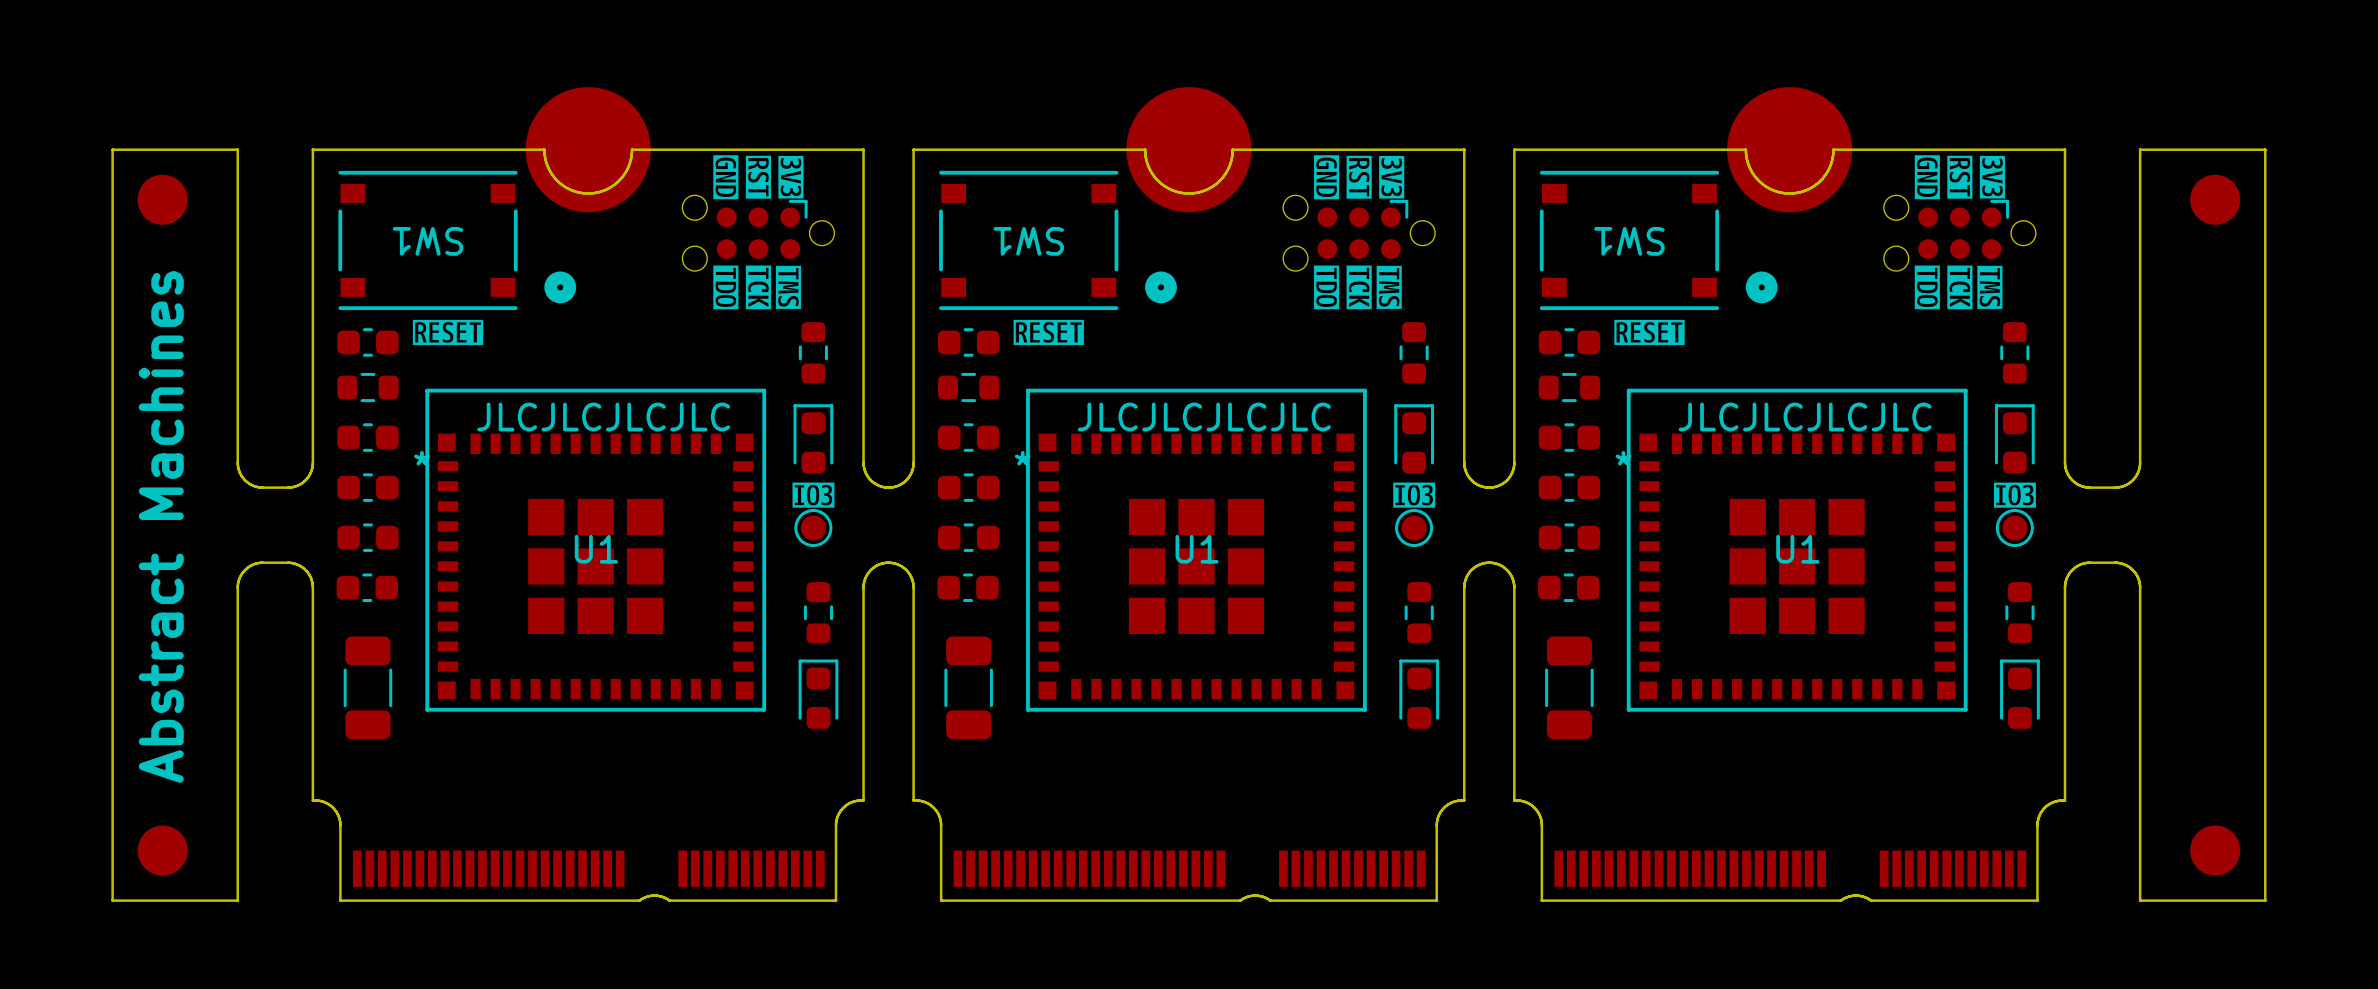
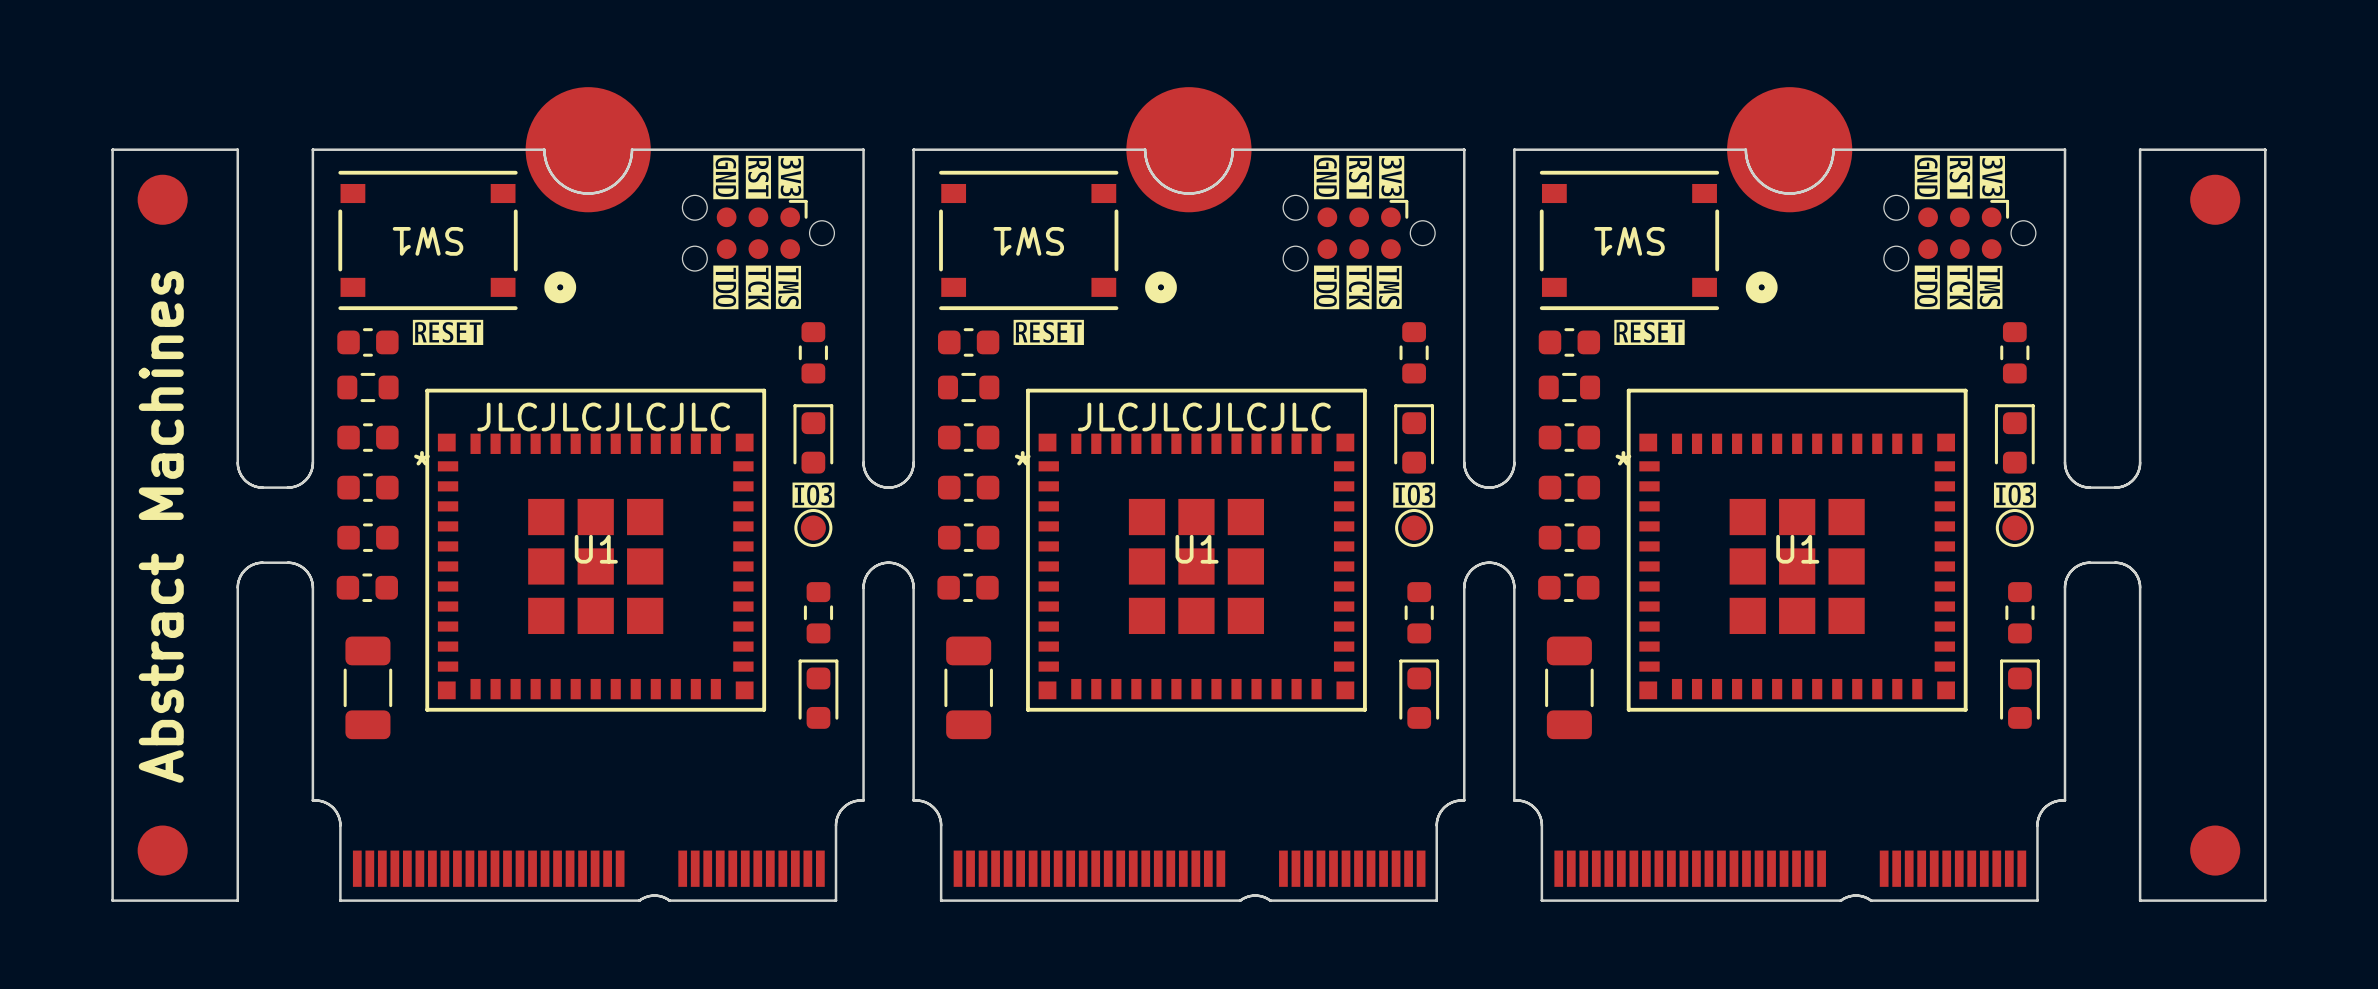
text: JLCJLCJLCJLC (1805, 416) -> none

